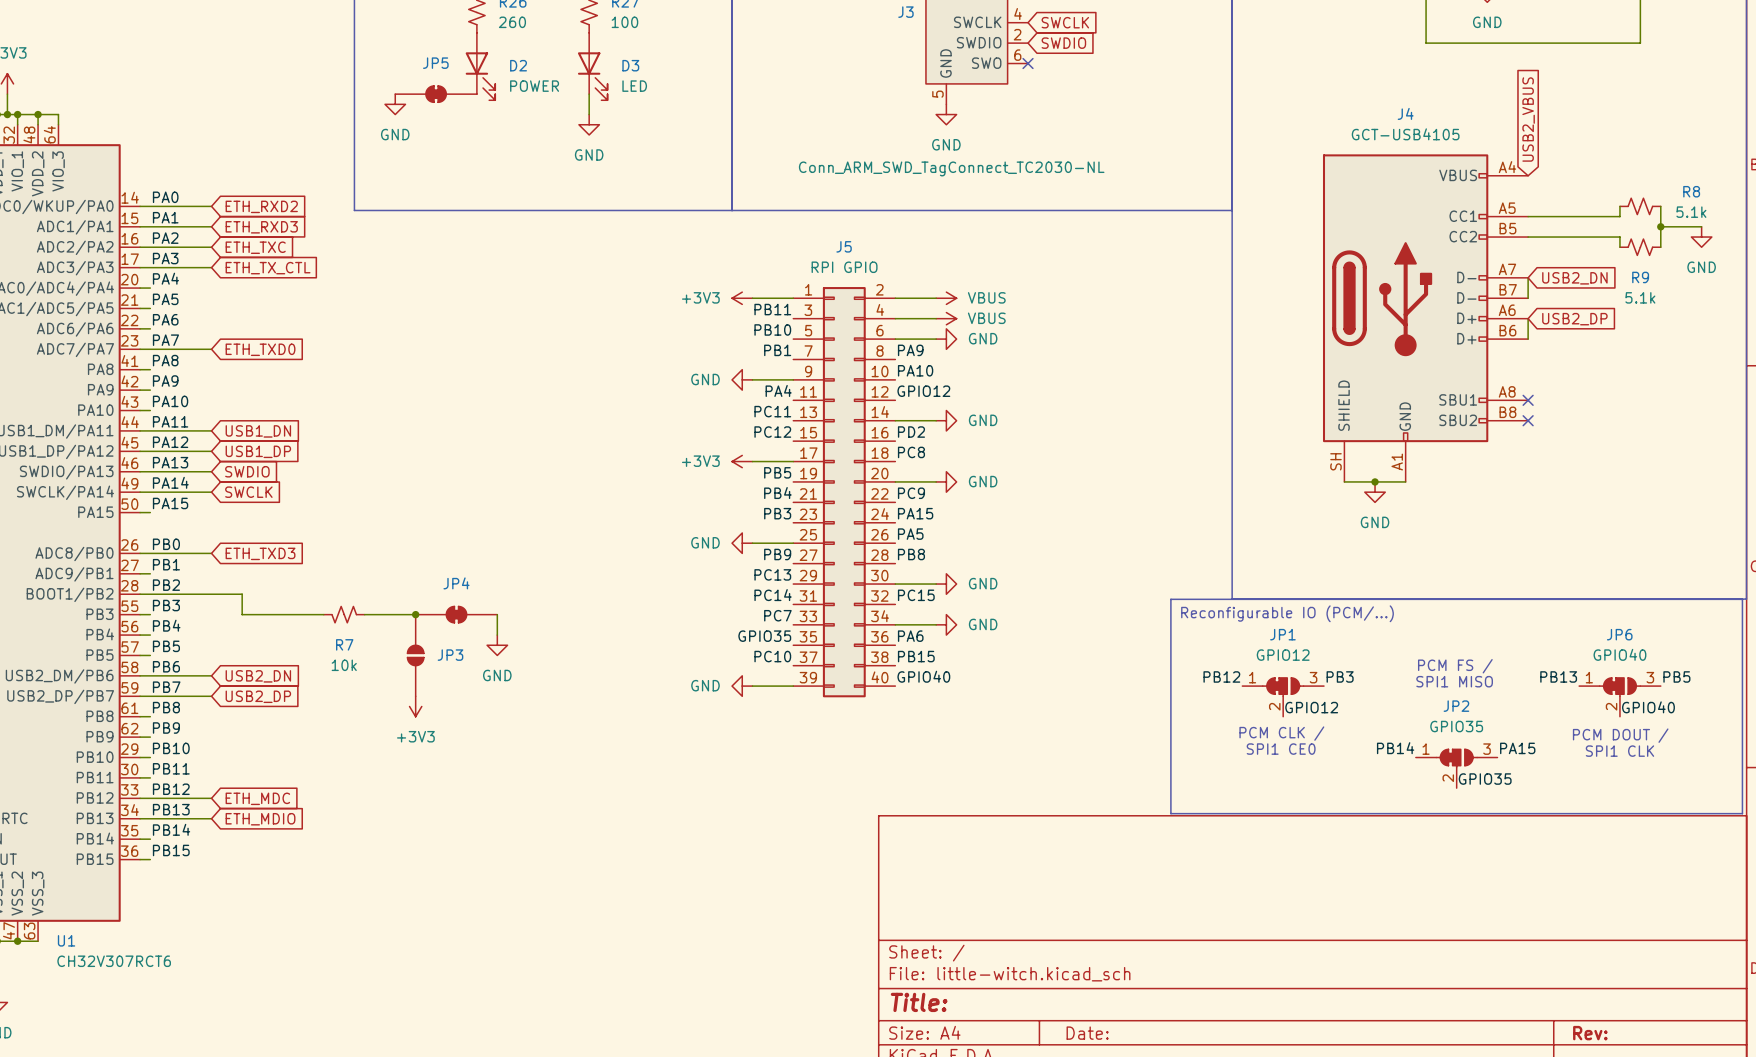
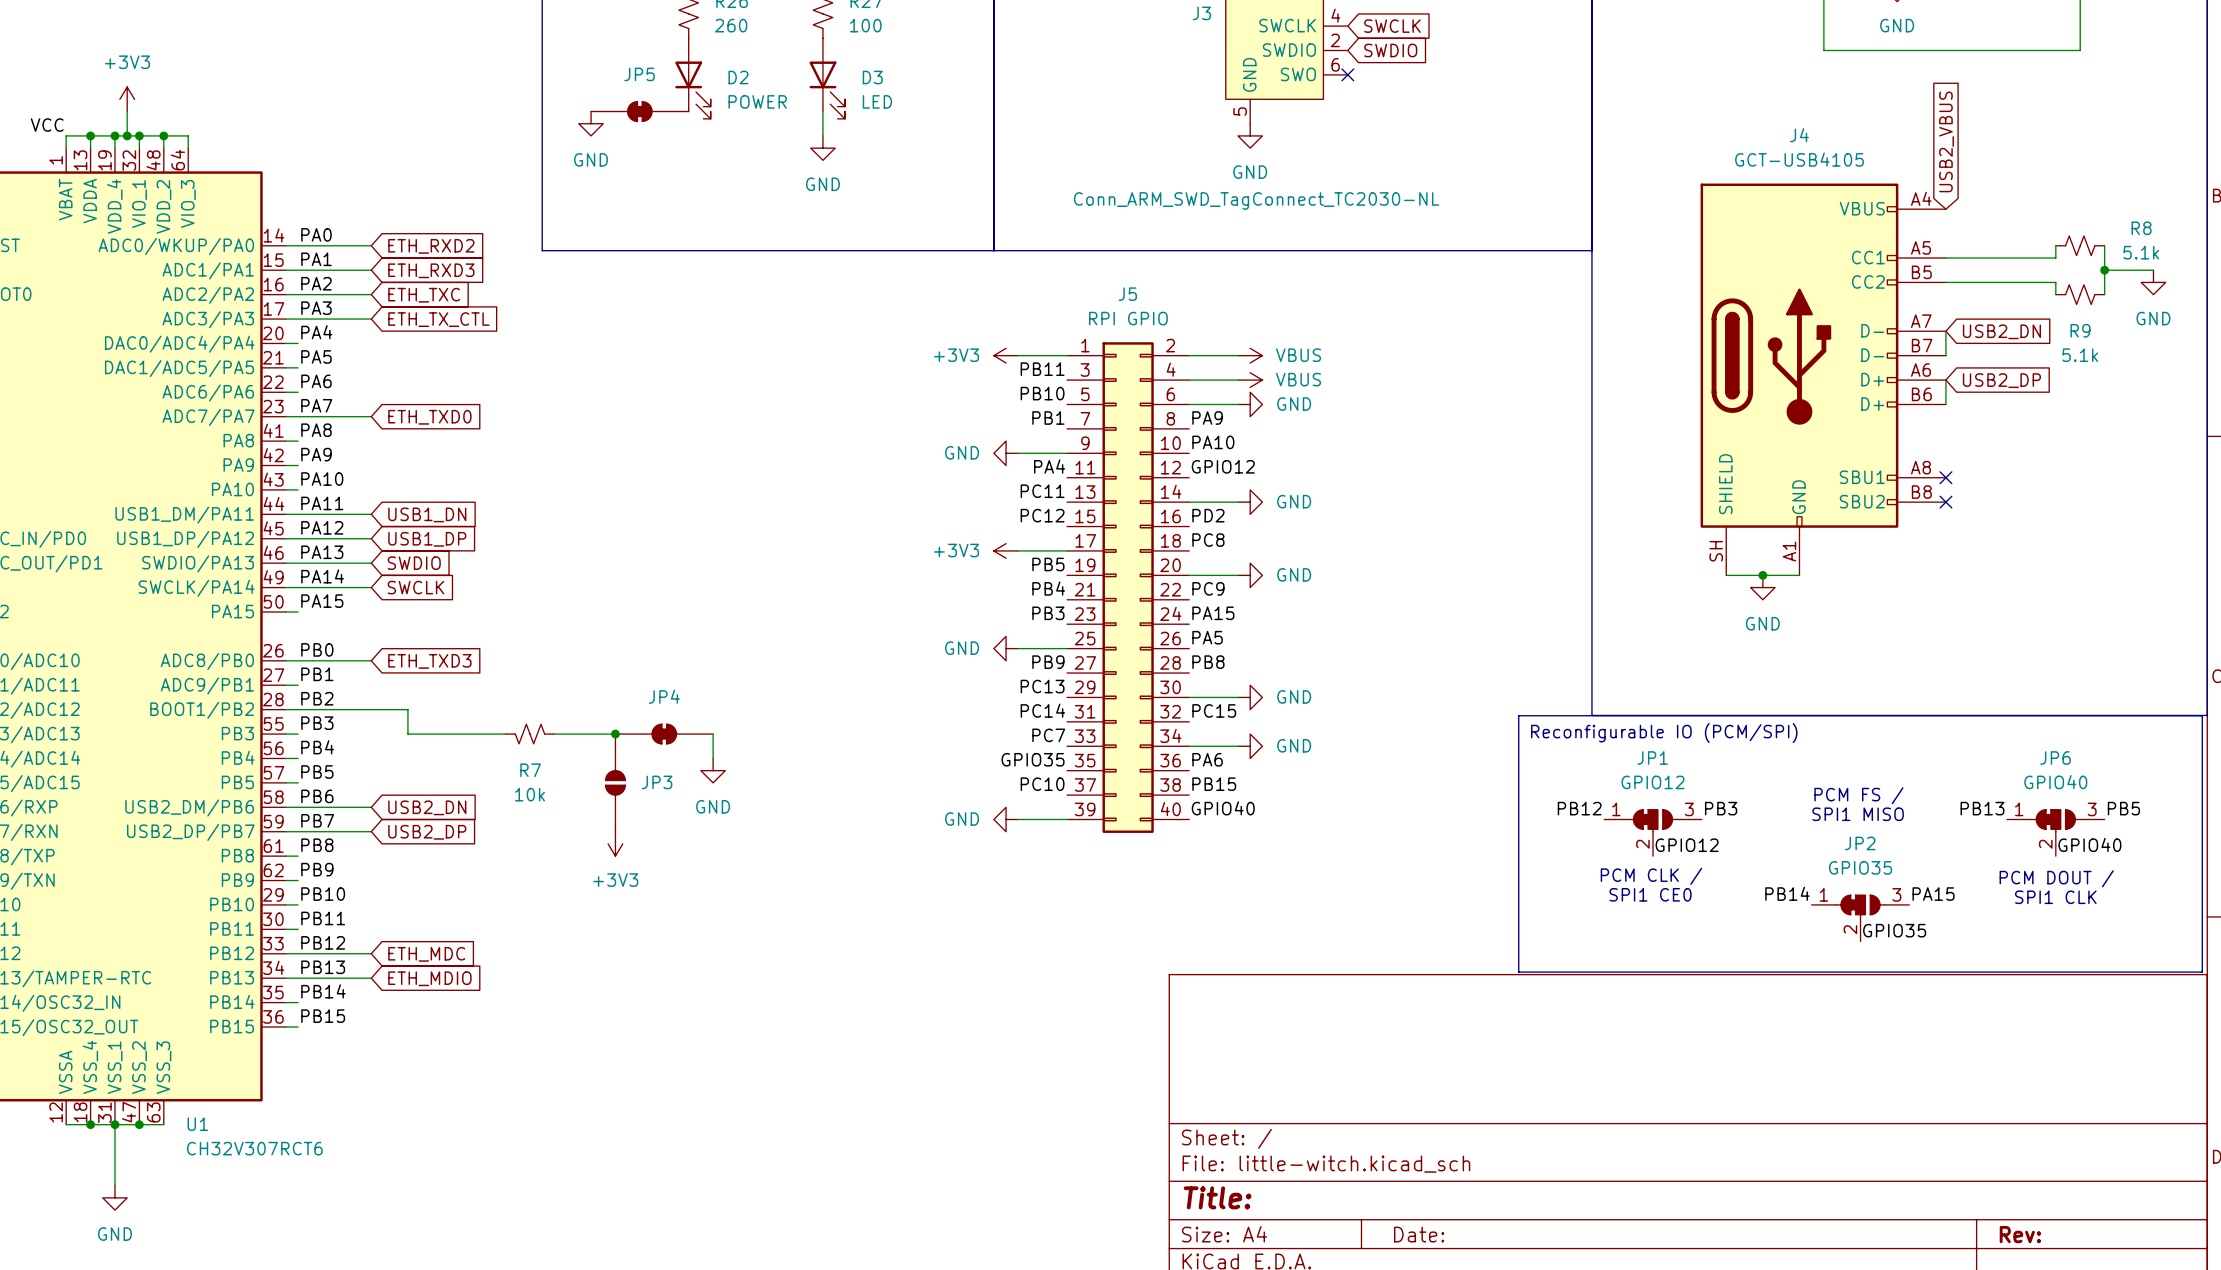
text: Reconfigurable IO (PCM/...) (1287, 613) -> Reconfigurable IO (PCM/SPI) (1664, 733)

